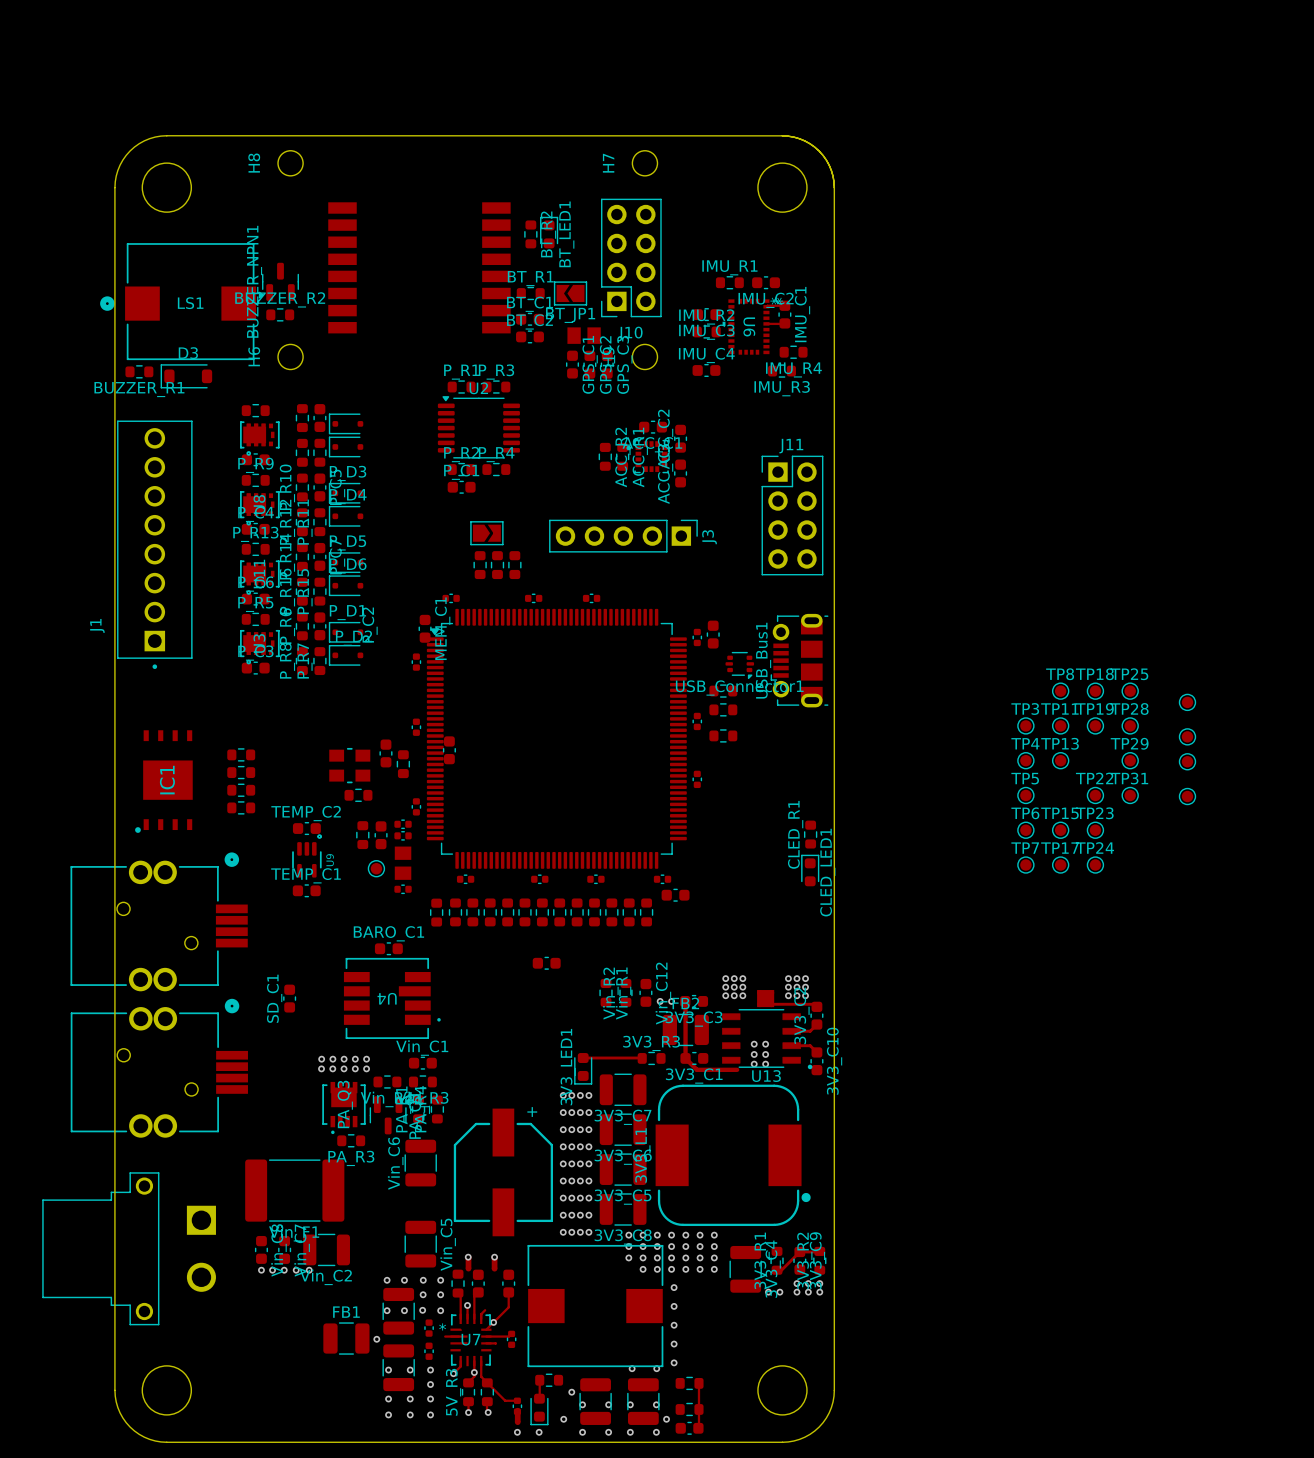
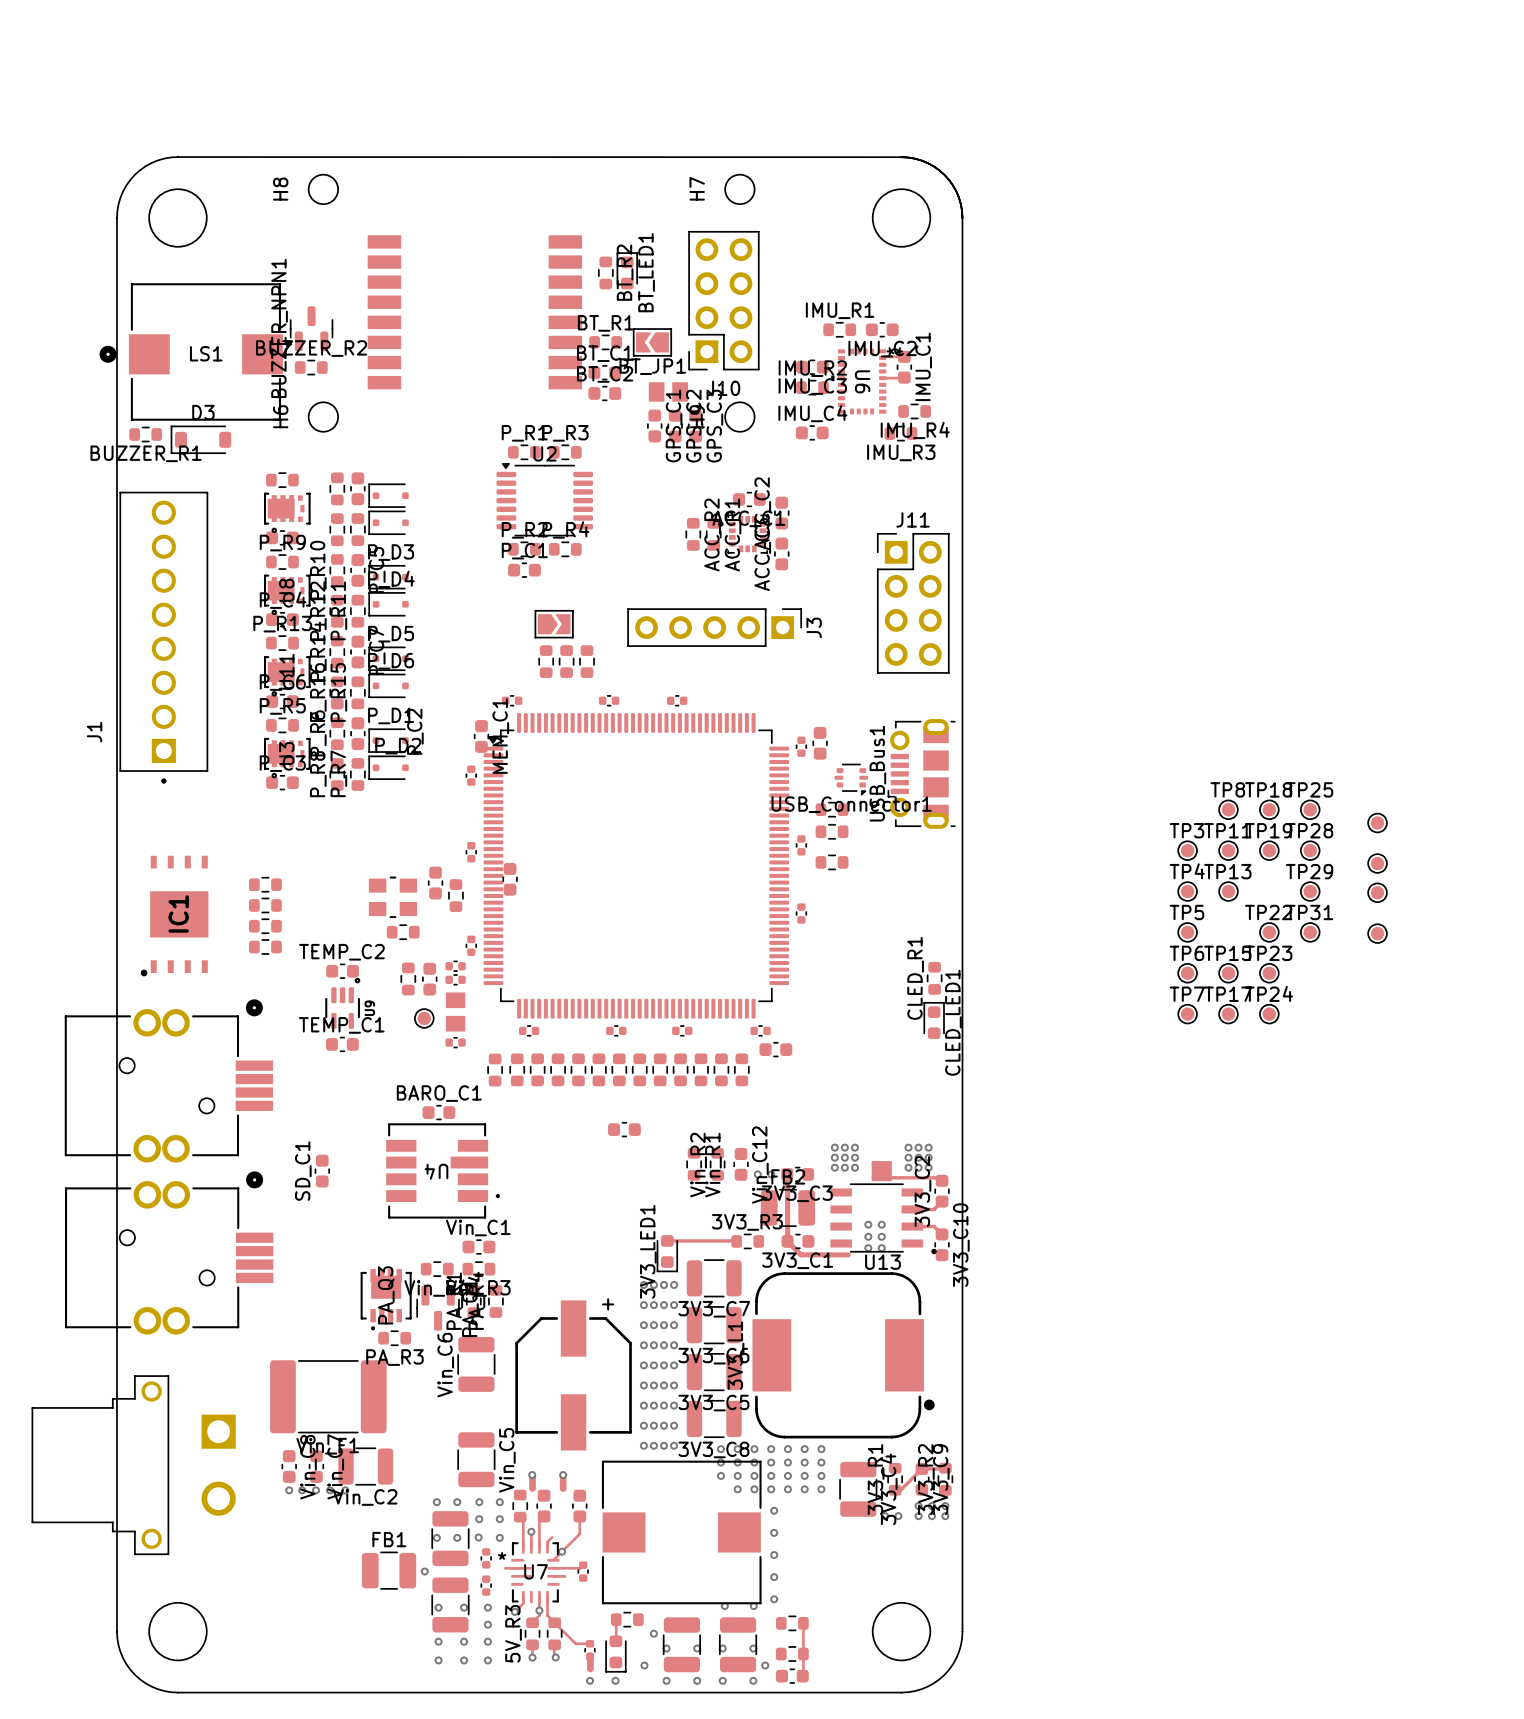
via: (321, 1059) -> none
via: (332, 1059) -> none
via: (344, 1059) -> none
via: (355, 1059) -> none
via: (366, 1059) -> none
via: (321, 1068) -> none
via: (332, 1068) -> none
via: (344, 1068) -> none
via: (355, 1068) -> none
via: (366, 1068) -> none

